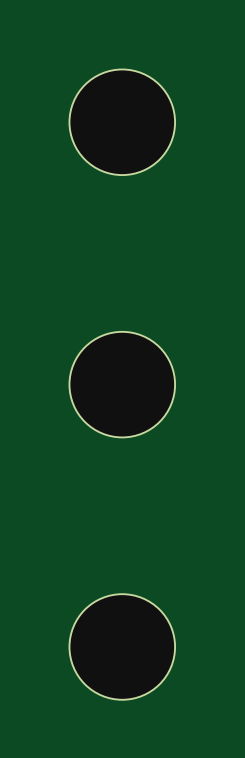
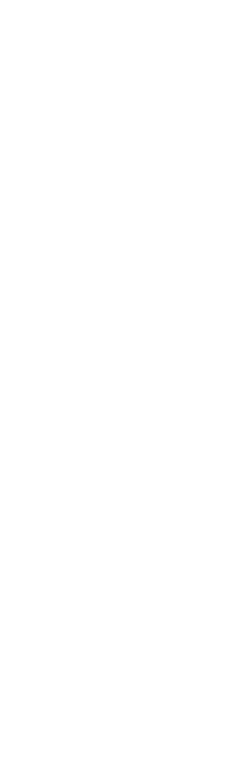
part: (122, 122) -> none
part: (122, 384) -> none
part: (122, 646) -> none

